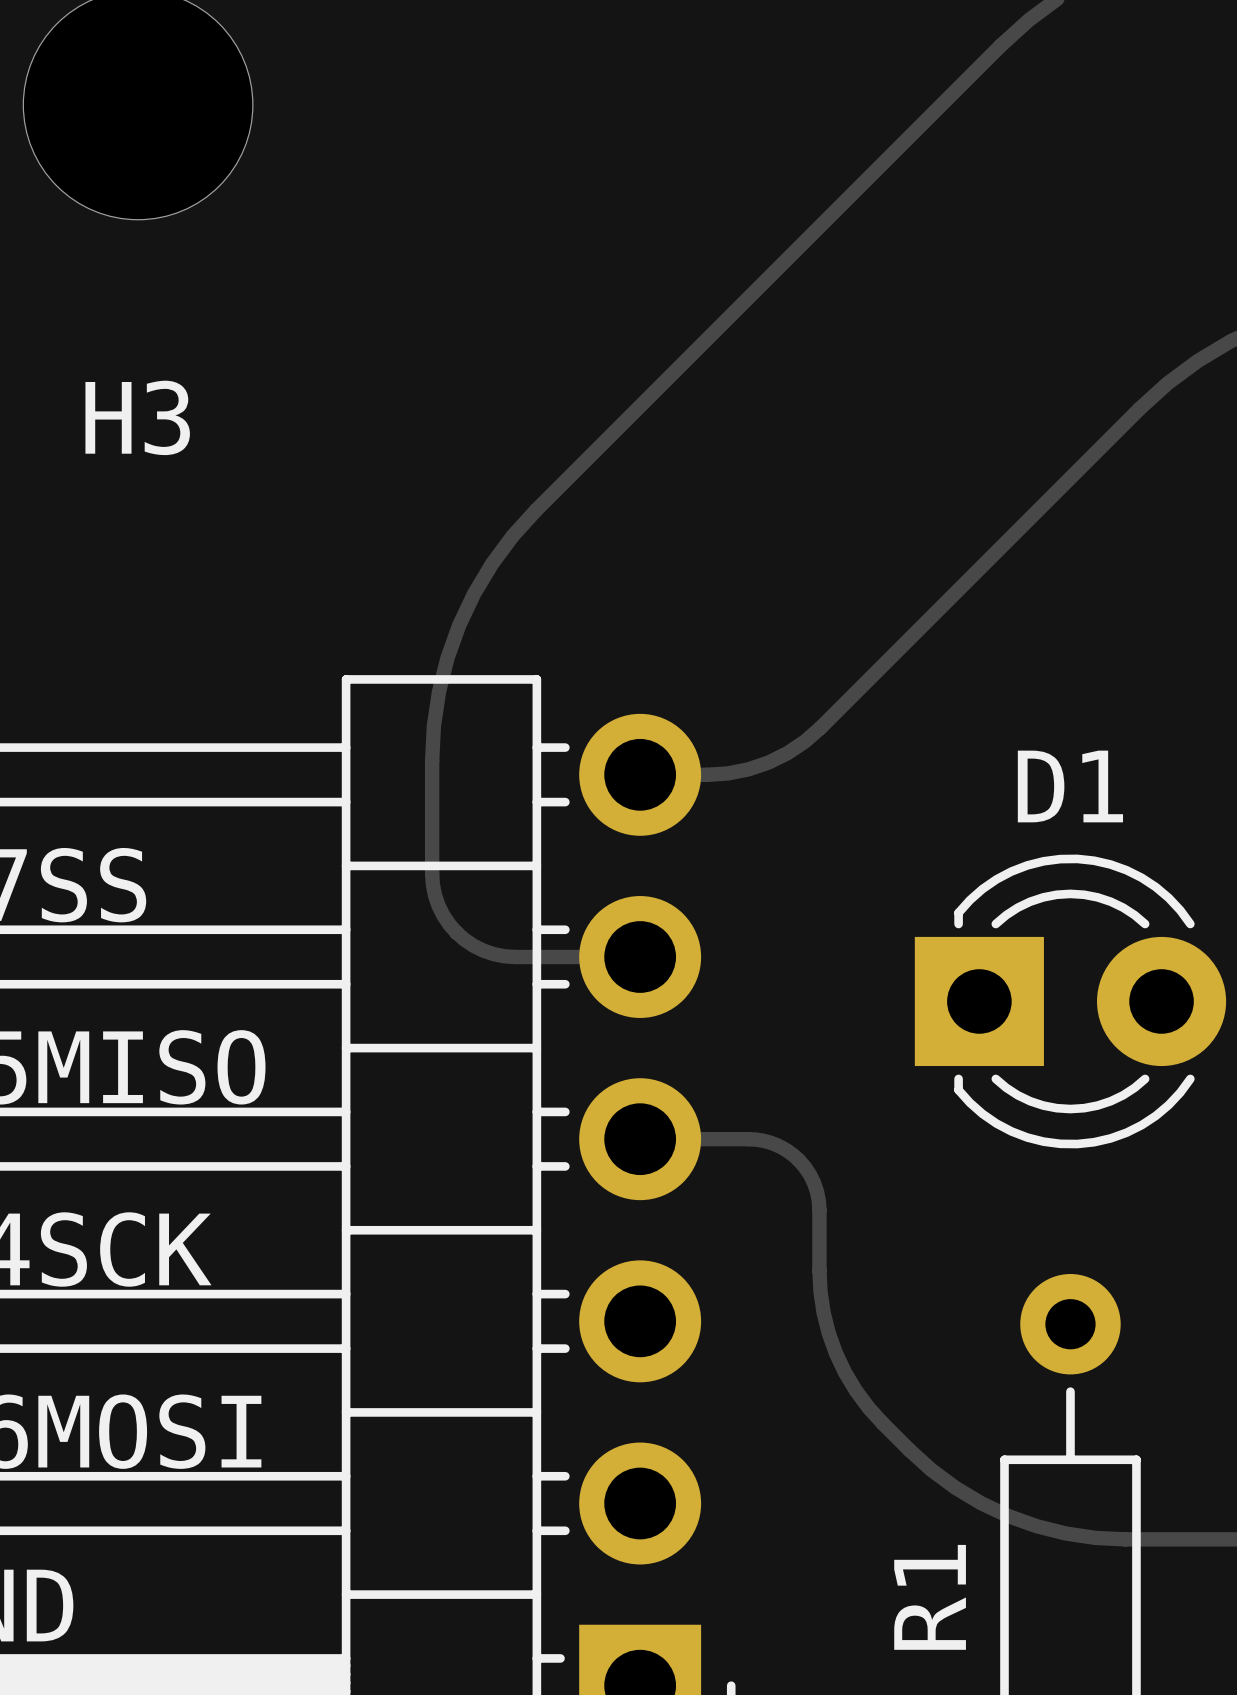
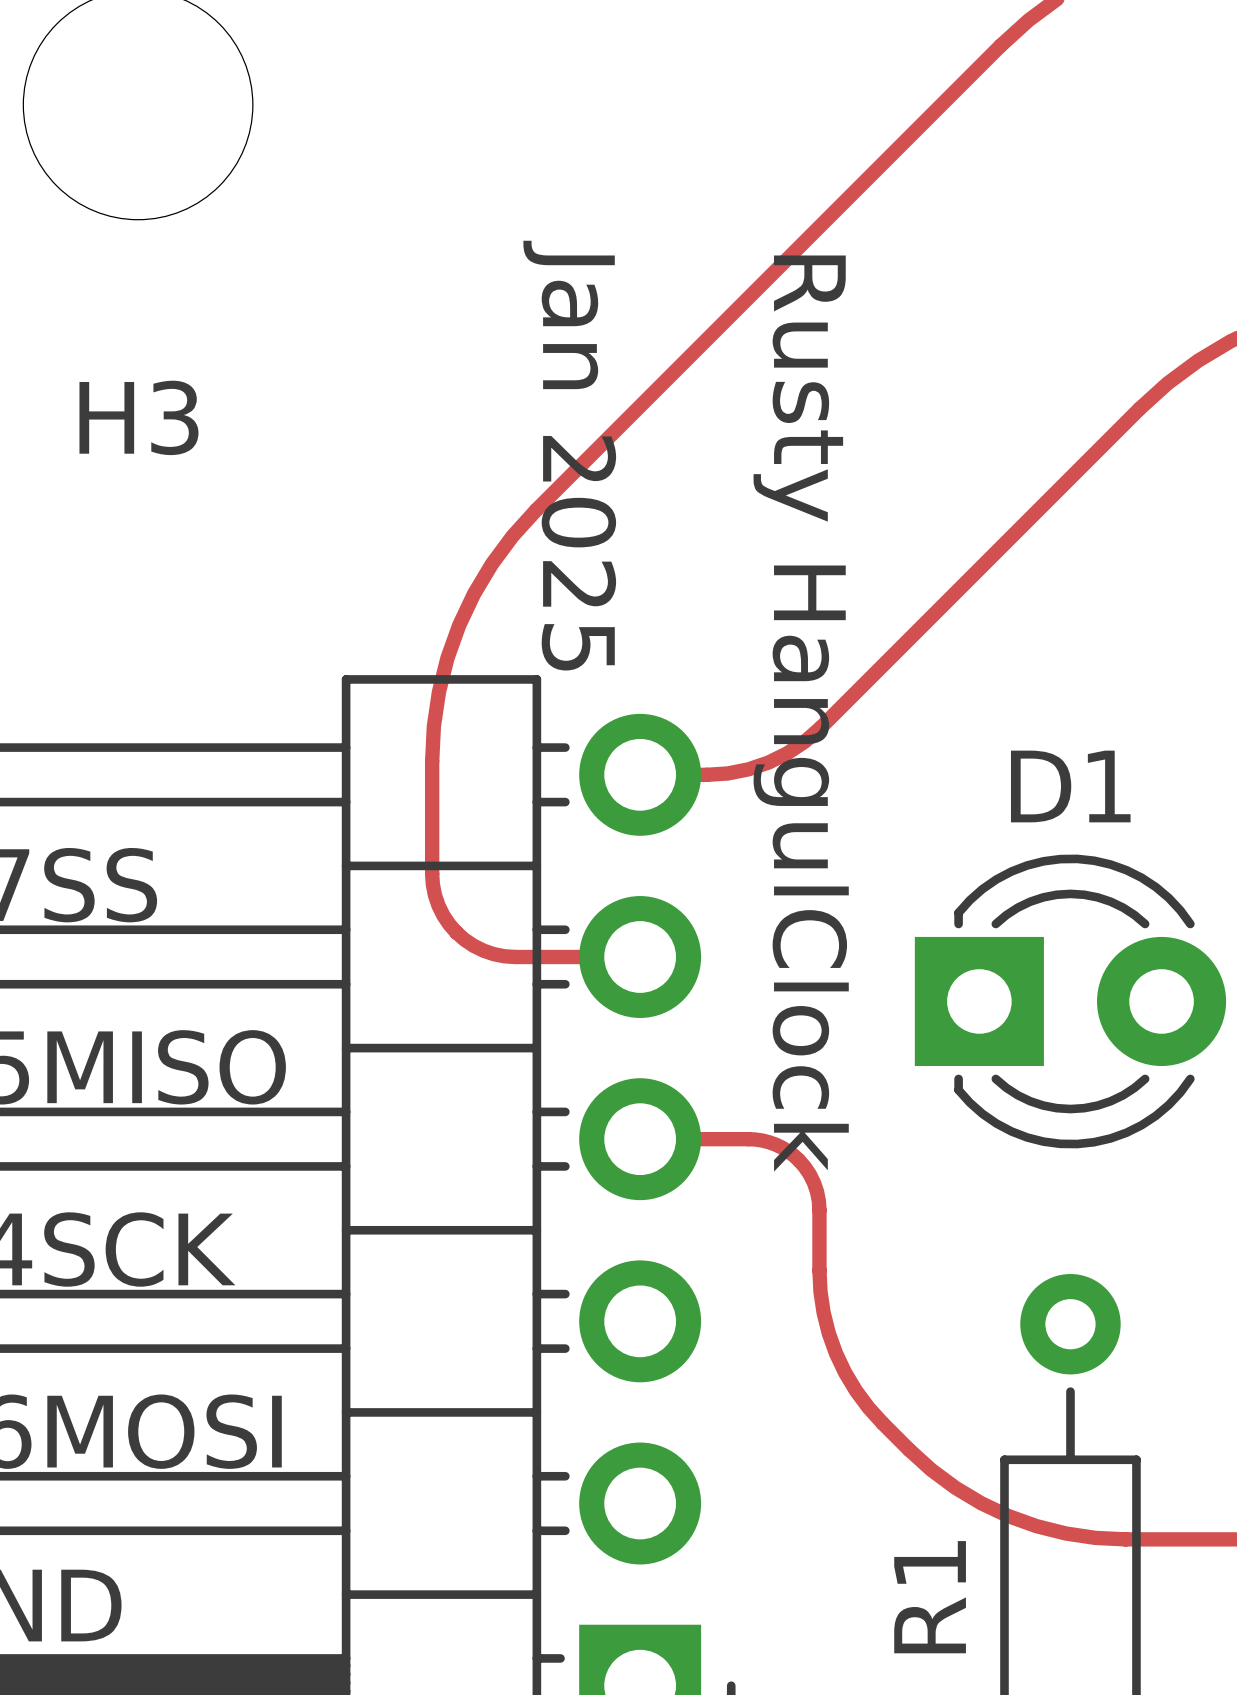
text: none -> Jan 2025 (569, 455)
text: none -> Rusty HangulClock (801, 713)

